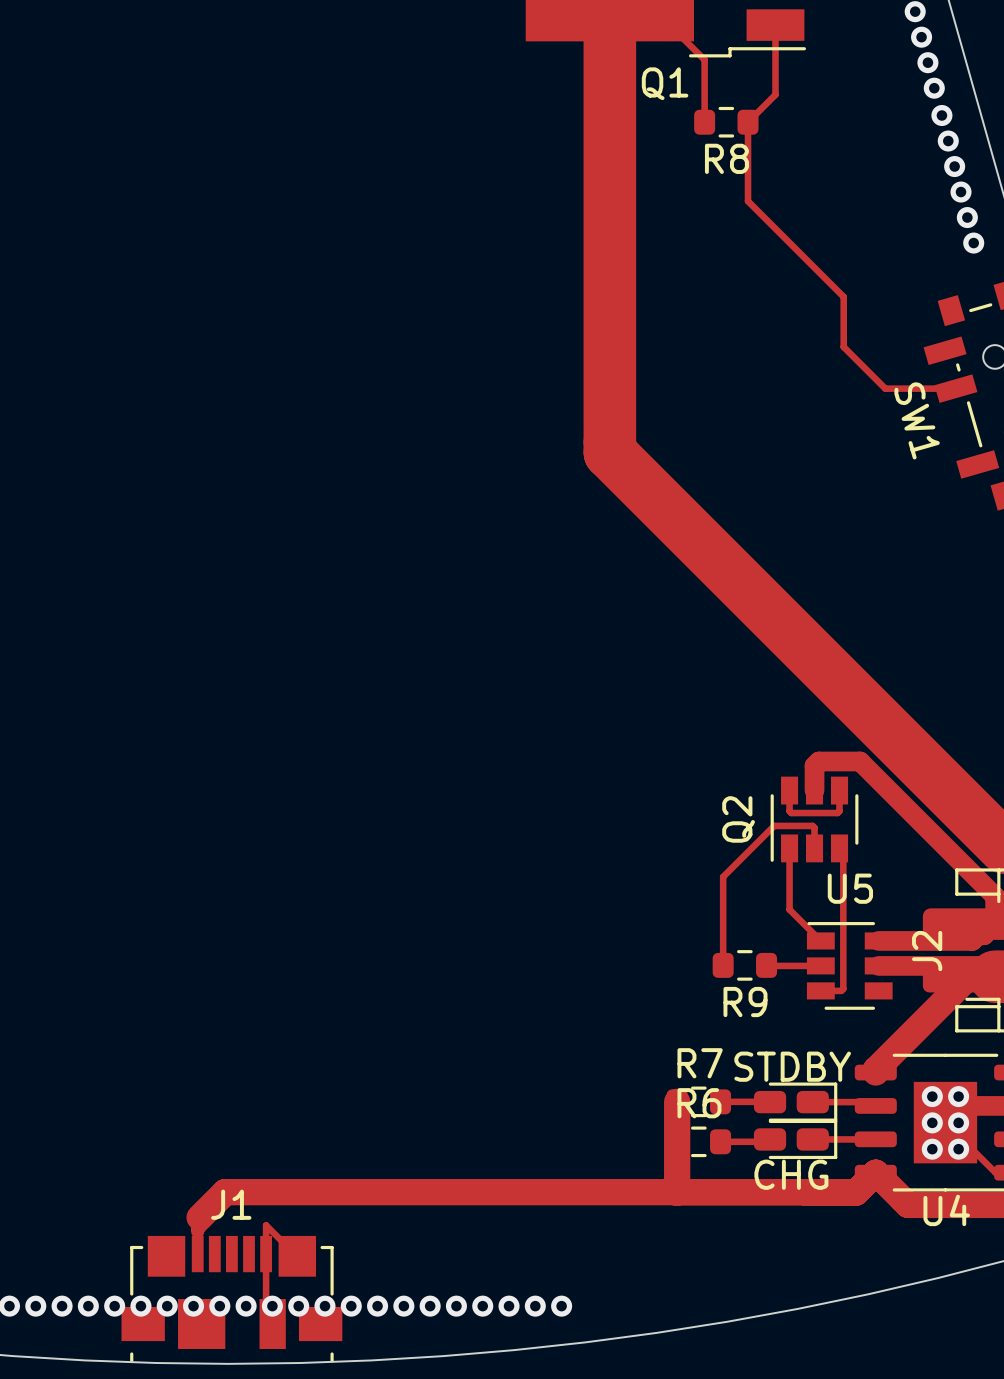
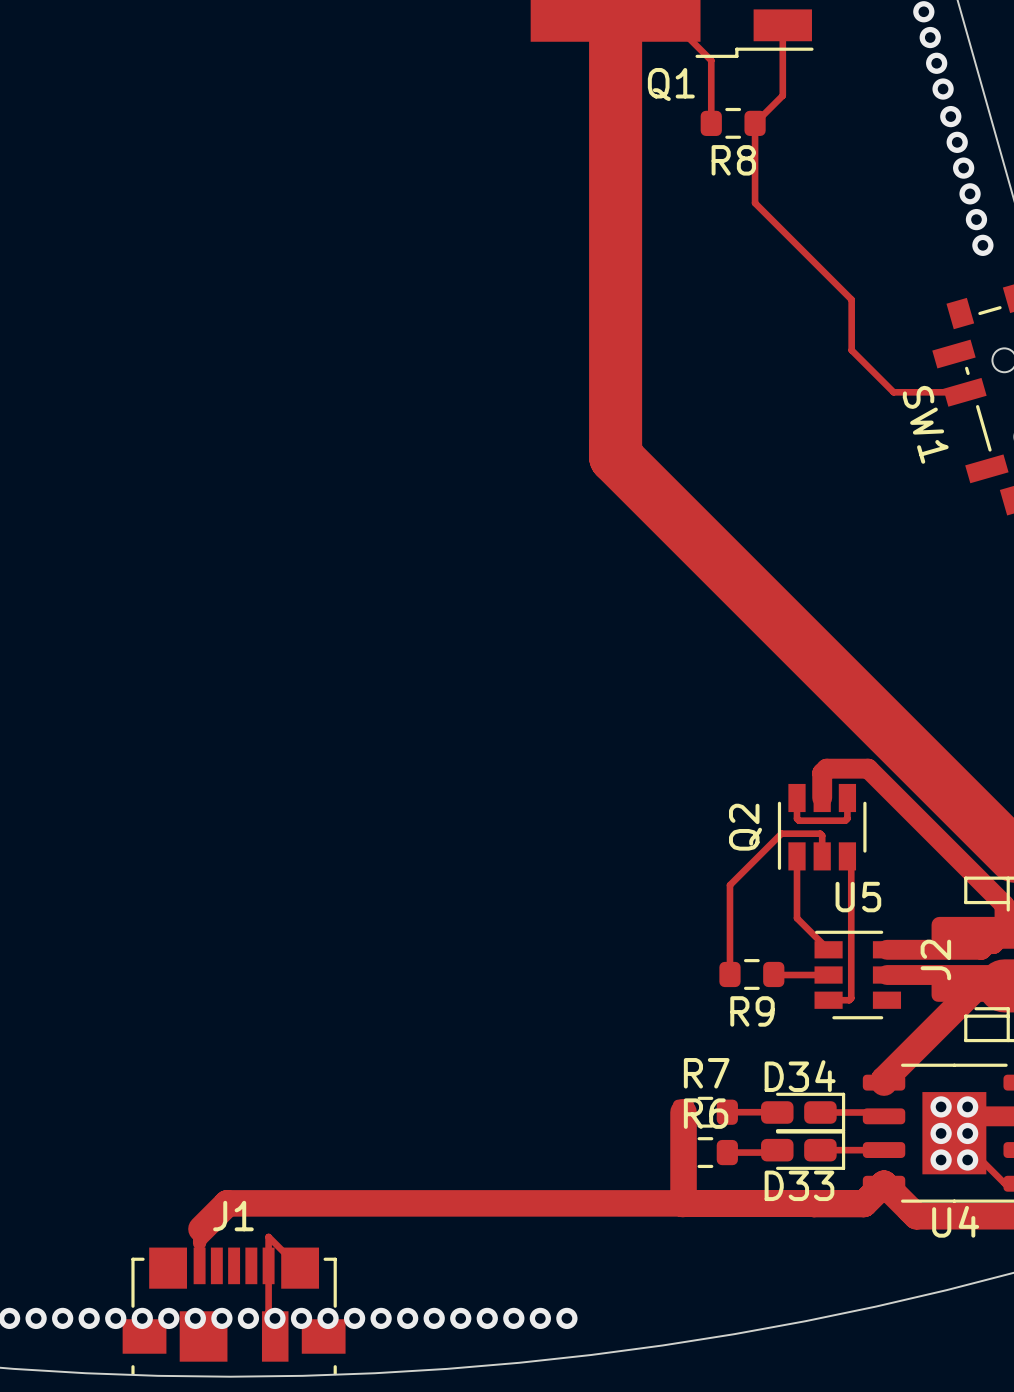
STDBY name: STDBY (792, 1066) -> D34 (800, 1076)
CHG name: CHG (791, 1174) -> D33 (799, 1185)

